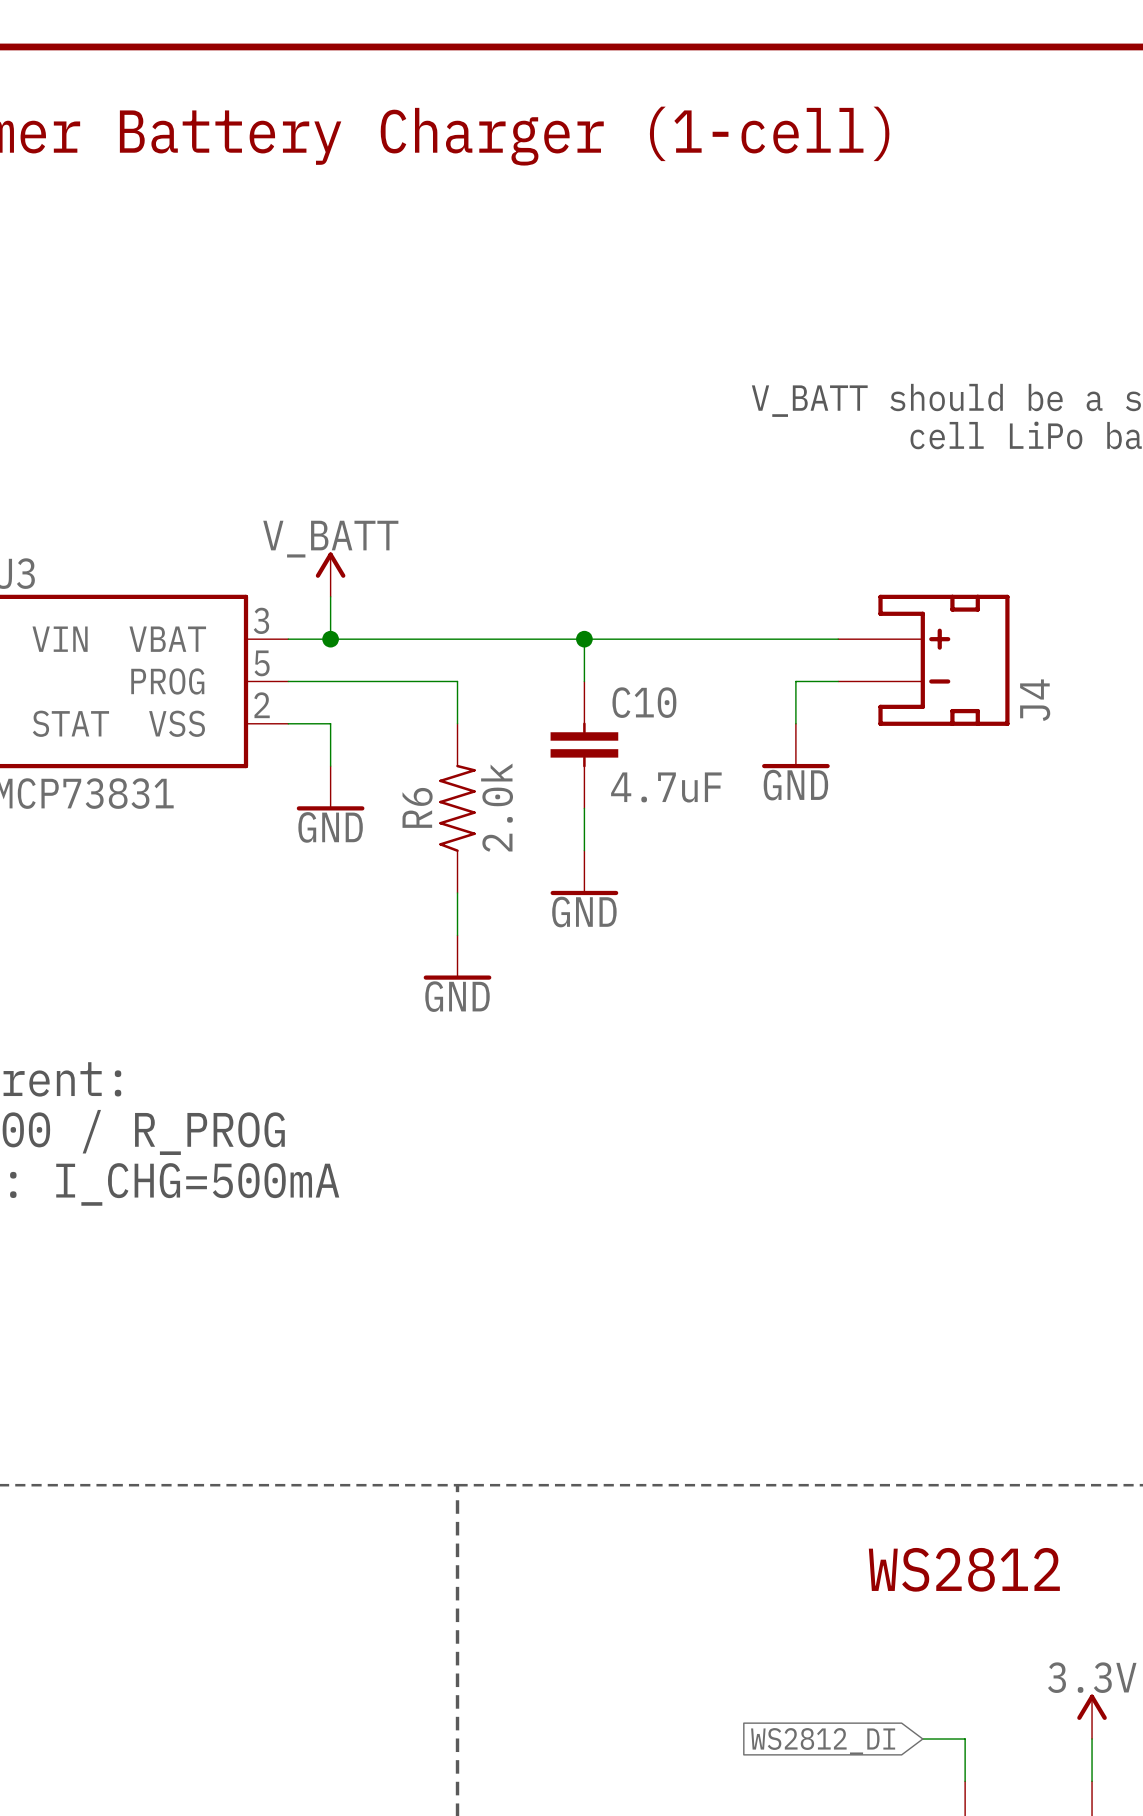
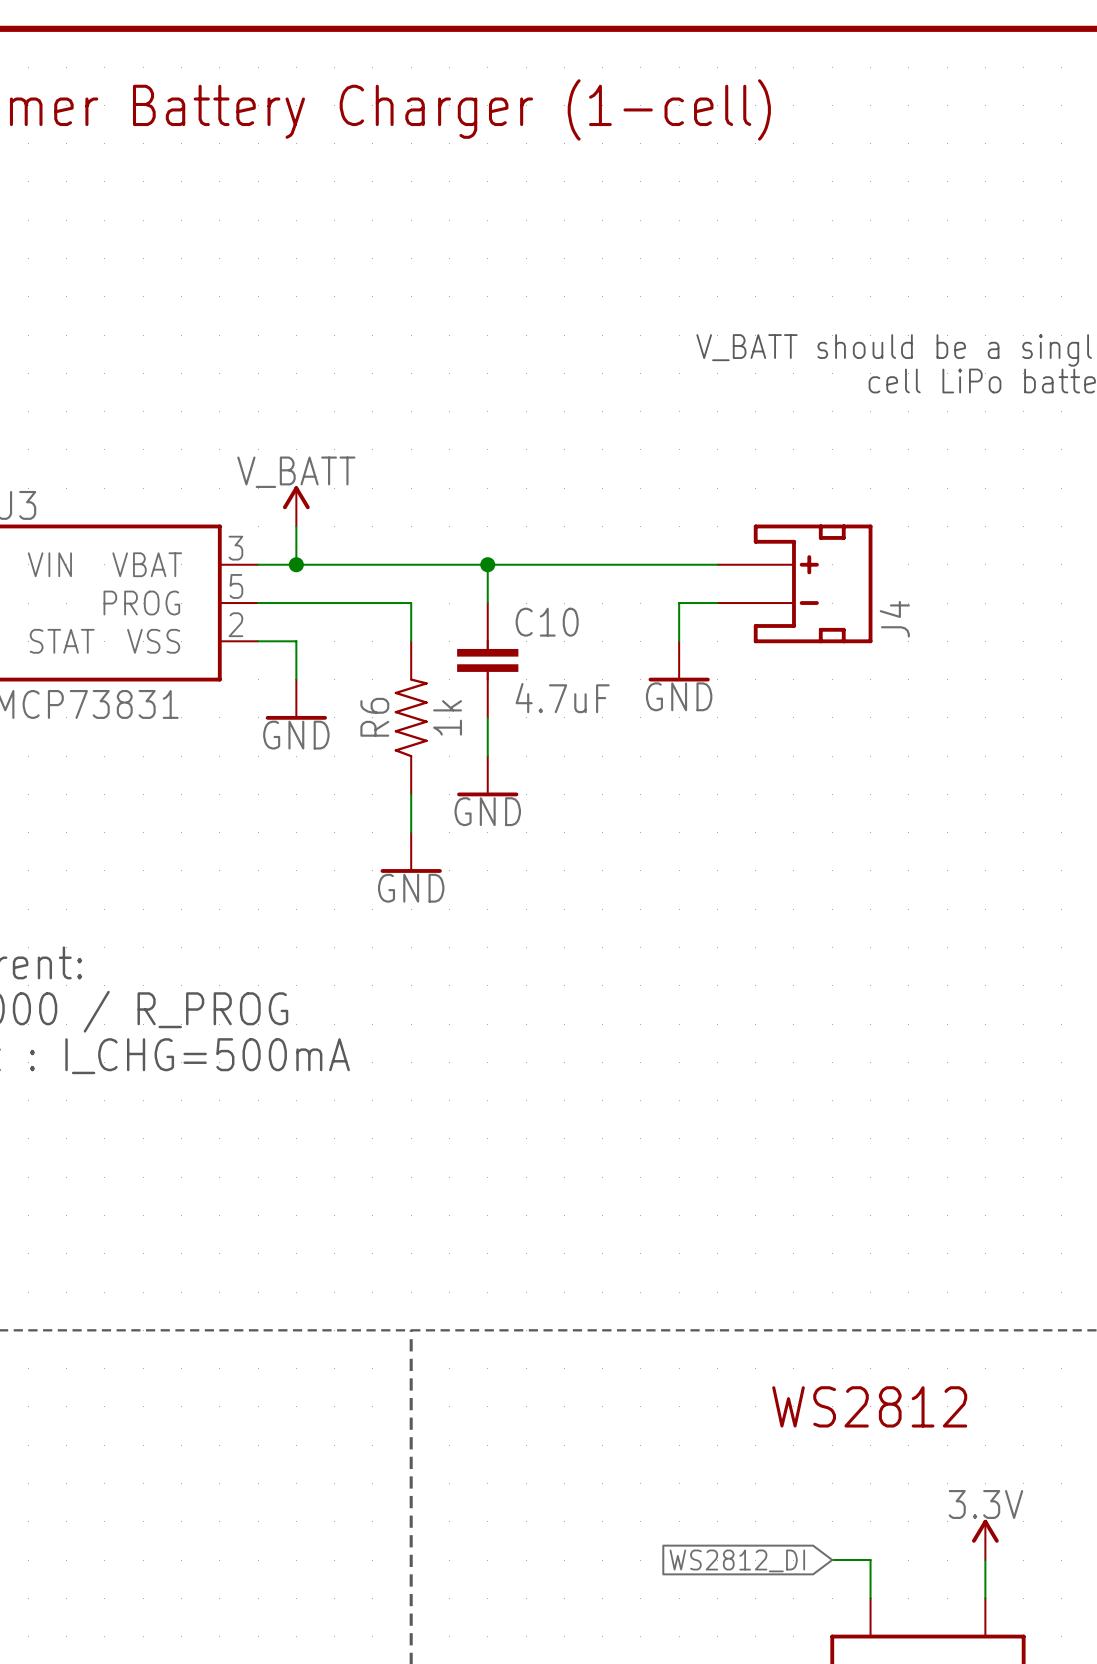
wire: (584, 639) (584, 681) -> (487, 564) (487, 603)
junction position: (584, 639) -> (487, 564)
J4 position: (923, 660) -> (794, 583)
wire: (838, 681) (795, 681) (795, 723) -> (717, 603) (679, 603) (679, 641)
C10 position: (584, 744) -> (487, 660)
power symbol position: GND (795, 745) -> GND (679, 661)
R6 value: 2.0k (497, 807) -> 1k (447, 717)
wire: (584, 808) (584, 850) -> (487, 717) (487, 756)
power symbol position: GND (584, 872) -> GND (487, 776)

